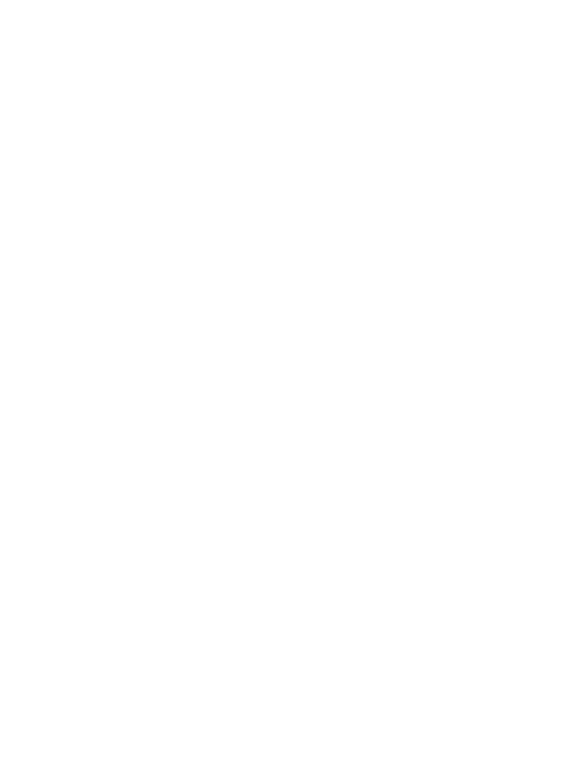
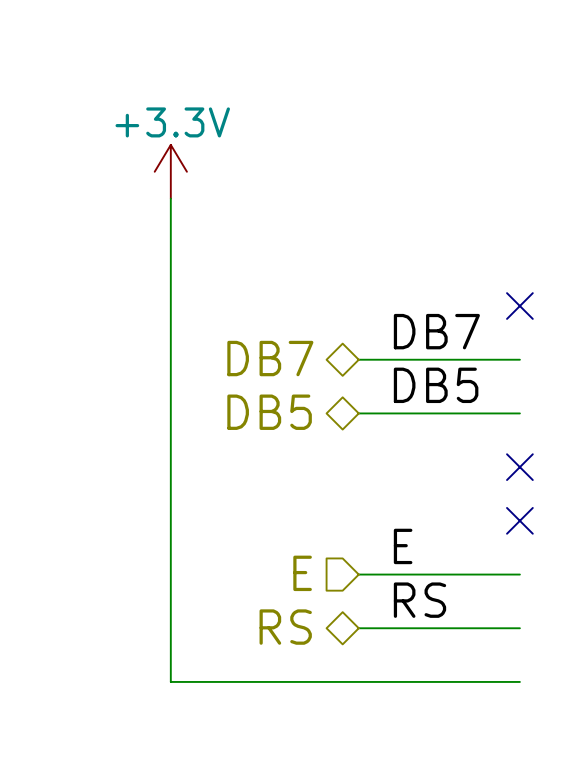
power symbol: none -> +3.3V (170, 171)
wire: none -> (170, 198) (170, 681) (519, 681)
no-connect mark: none -> (519, 306)
label: none -> DB7 (436, 331)
hierarchical label: none -> DB7 (270, 358)
wire: none -> (358, 359) (519, 359)
label: none -> DB5 (436, 385)
hierarchical label: none -> DB5 (269, 412)
wire: none -> (358, 413) (519, 413)
no-connect mark: none -> (519, 467)
no-connect mark: none -> (519, 520)
label: none -> E (403, 546)
hierarchical label: none -> E (302, 573)
wire: none -> (358, 574) (519, 574)
label: none -> RS (419, 600)
hierarchical label: none -> RS (285, 627)
wire: none -> (358, 628) (519, 628)

